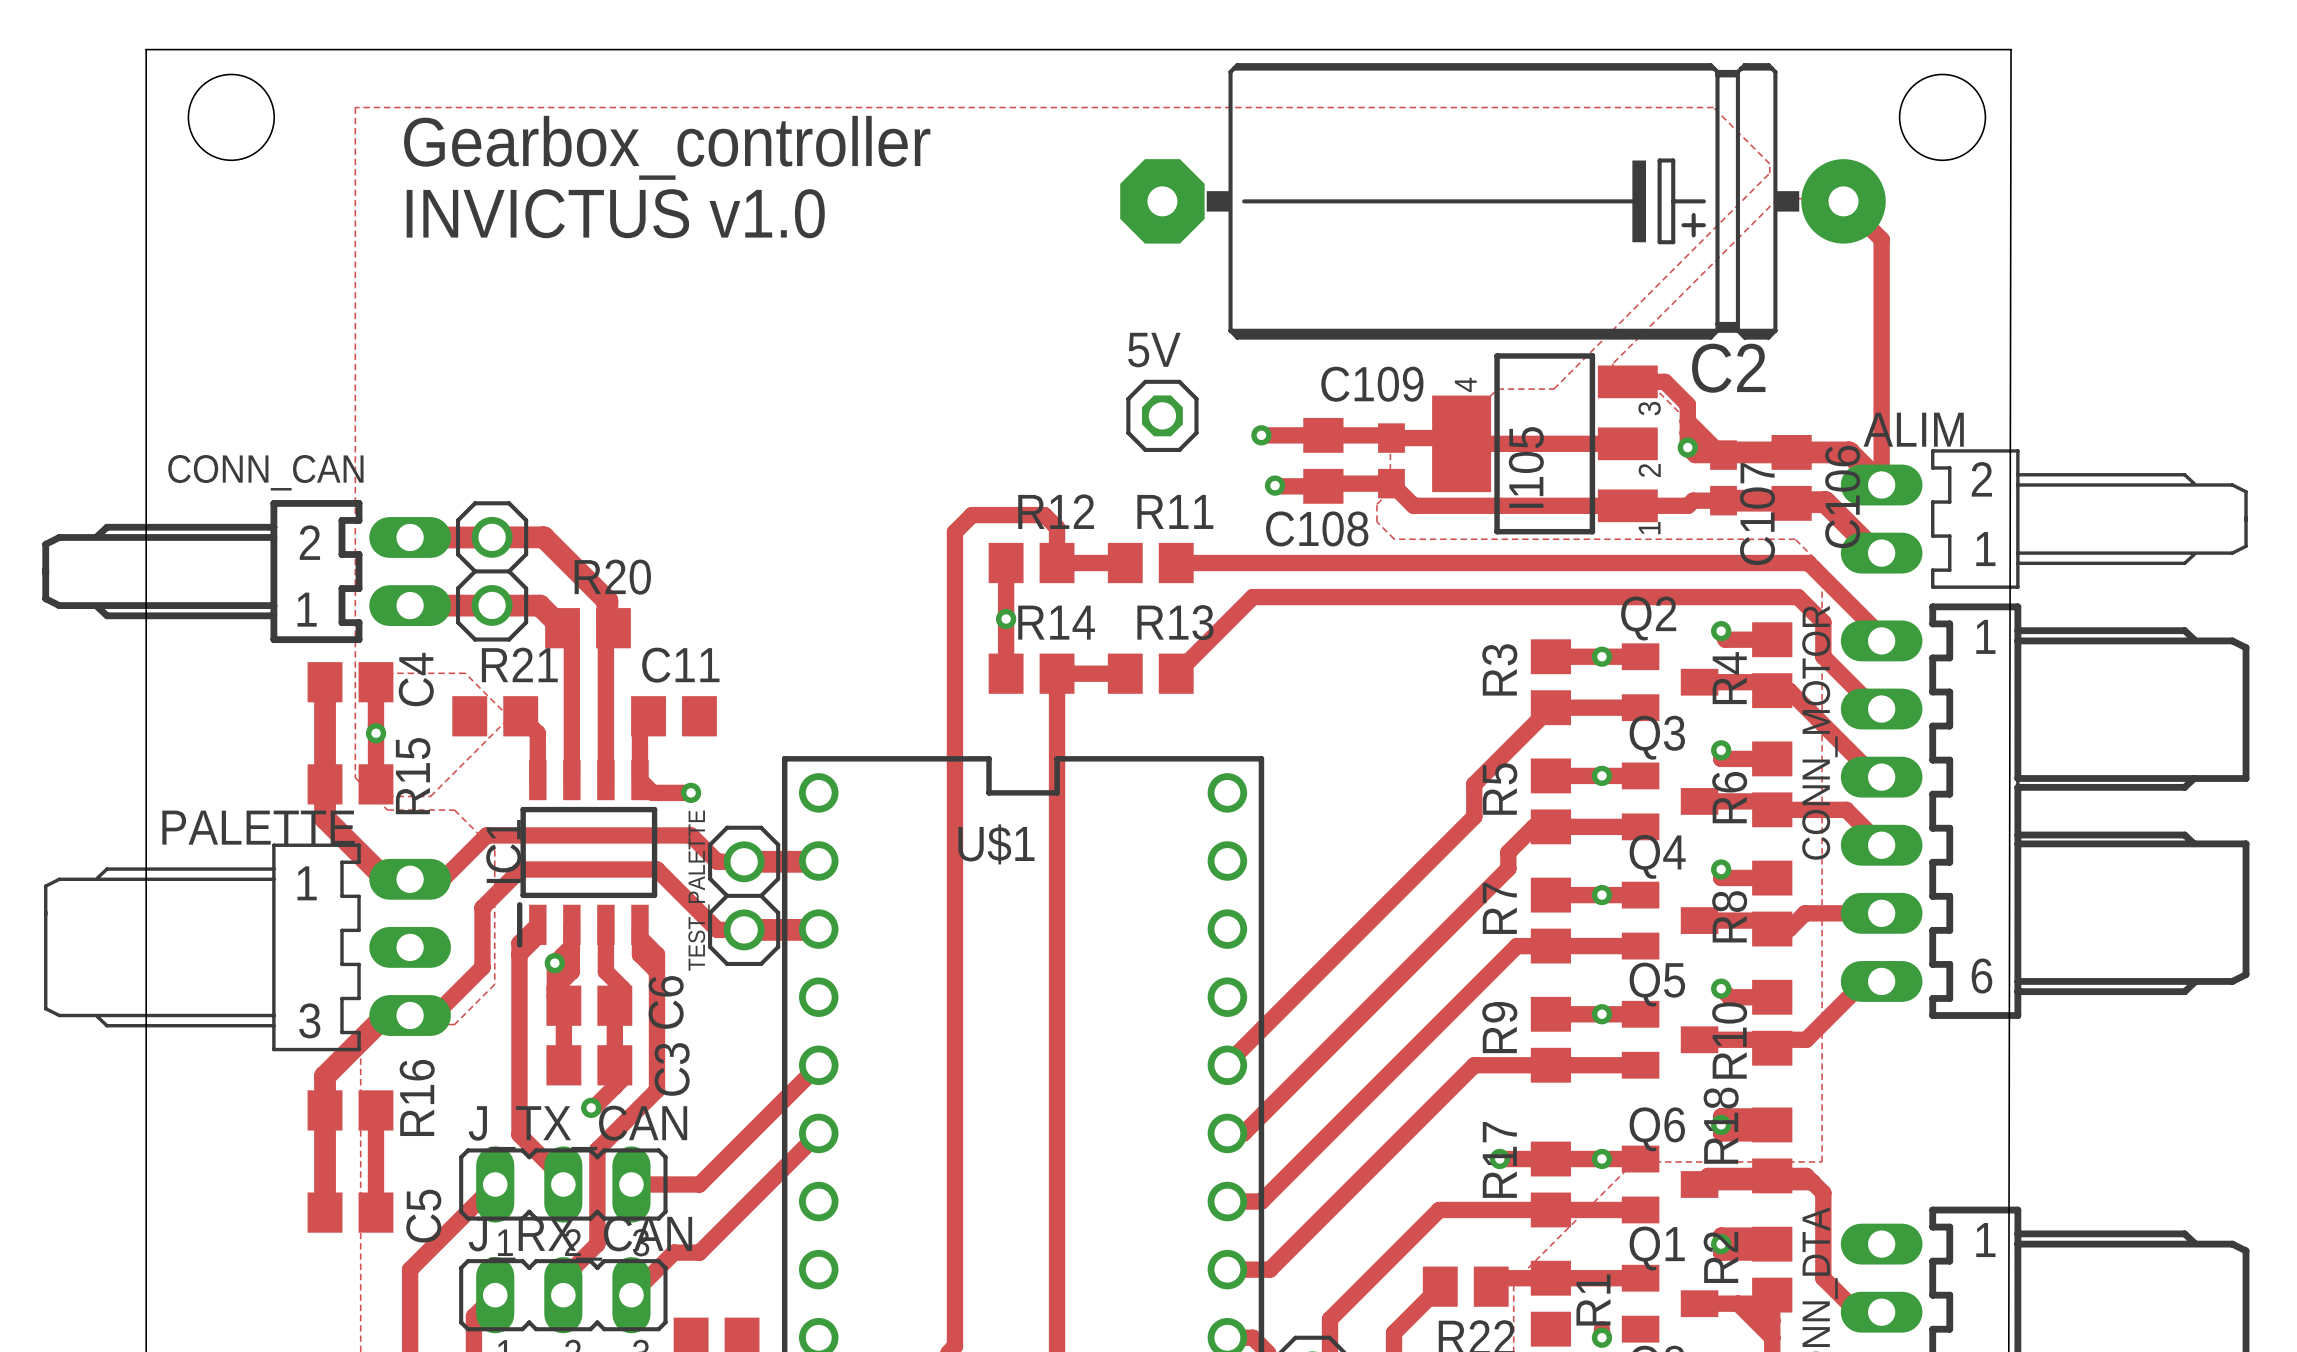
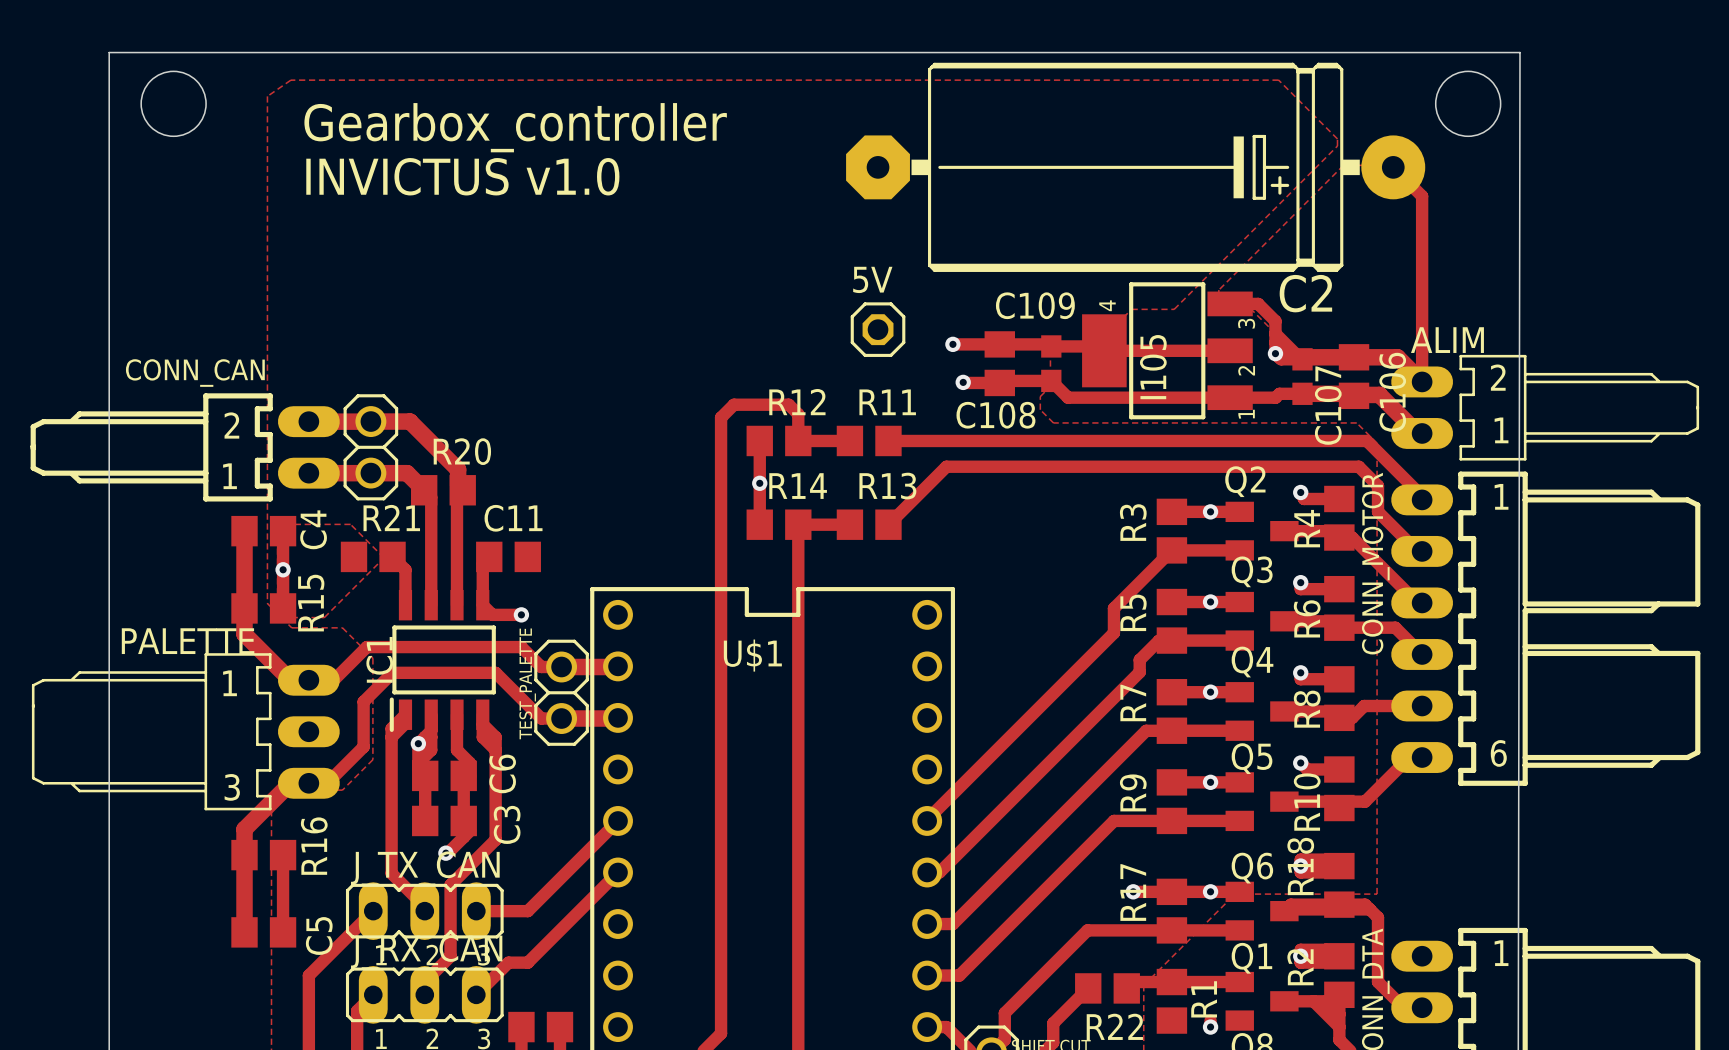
zone outline: (355, 107) (1713, 107) -> (267, 96) (290, 80) (1278, 80) (1294, 96)

